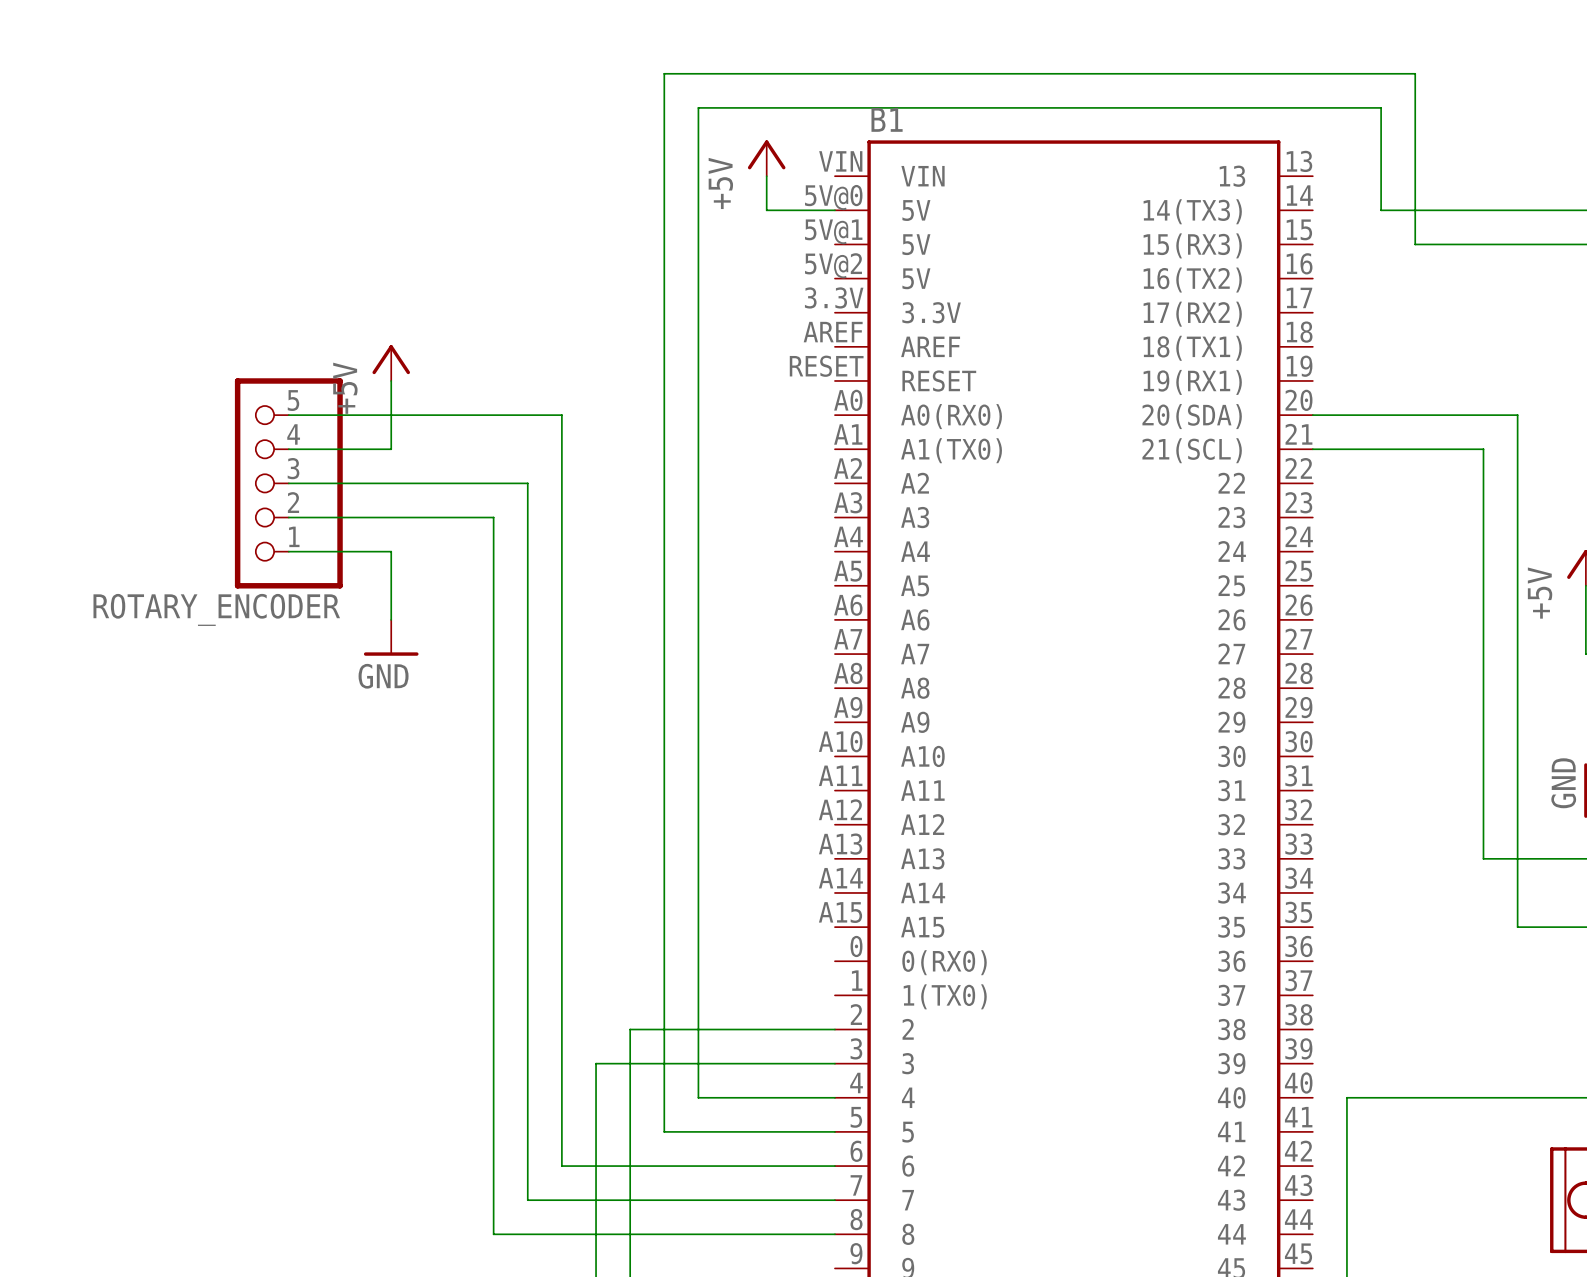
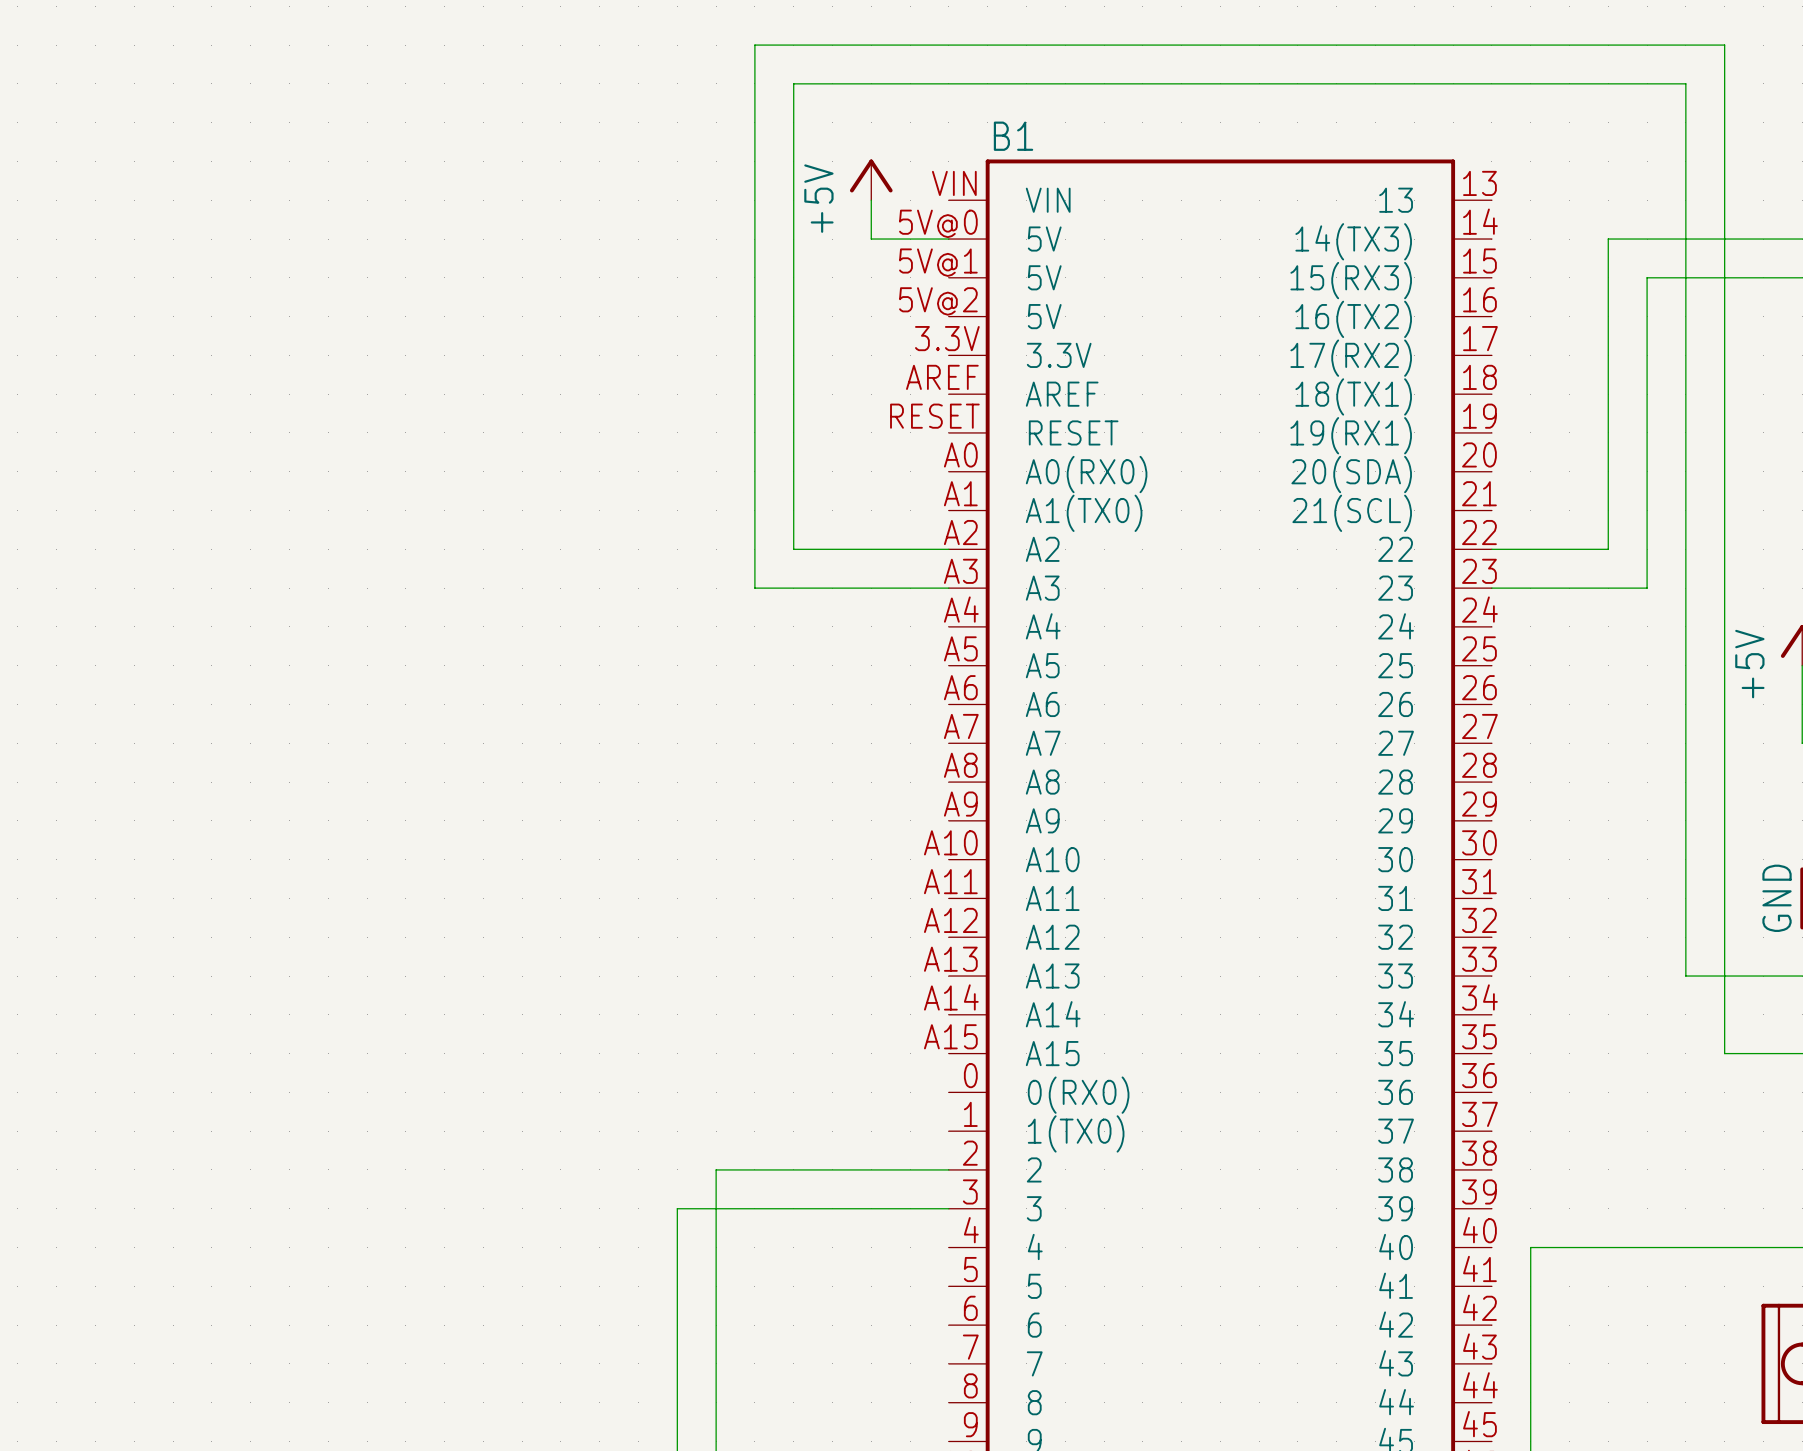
wire: (664, 73) (698, 73) -> (793, 122) (793, 83)
wire: (1415, 73) (1415, 210) (1381, 210) (1381, 107) (698, 107) -> none
wire: (1415, 244) (1449, 244) -> (1608, 277) (1608, 549) (1491, 549)
wire: none -> (1647, 277) (1647, 588) (1491, 588)
power symbol: +5V (391, 363) -> none
wire: (391, 380) (391, 449) (288, 449) -> none
wire: (288, 415) (561, 415) (561, 1166) (834, 1166) -> none
wire: (1312, 415) (1517, 415) -> (754, 83) (754, 45) (1724, 45) (1724, 471)
wire: (1312, 449) (1483, 449) -> (1608, 83) (1685, 83) (1685, 510)
wire: (288, 483) (527, 483) (527, 1200) (834, 1200) -> none
ROTARY_ENCODER: (288, 483) -> none
wire: (698, 483) (698, 1097) (834, 1097) -> (793, 549) (948, 549)
wire: (288, 517) (493, 517) (493, 1234) (834, 1234) -> none
wire: (664, 517) (664, 1131) (834, 1131) -> (754, 588) (948, 588)
wire: (288, 551) (391, 551) (391, 619) -> none
power symbol: GND (391, 637) -> none

